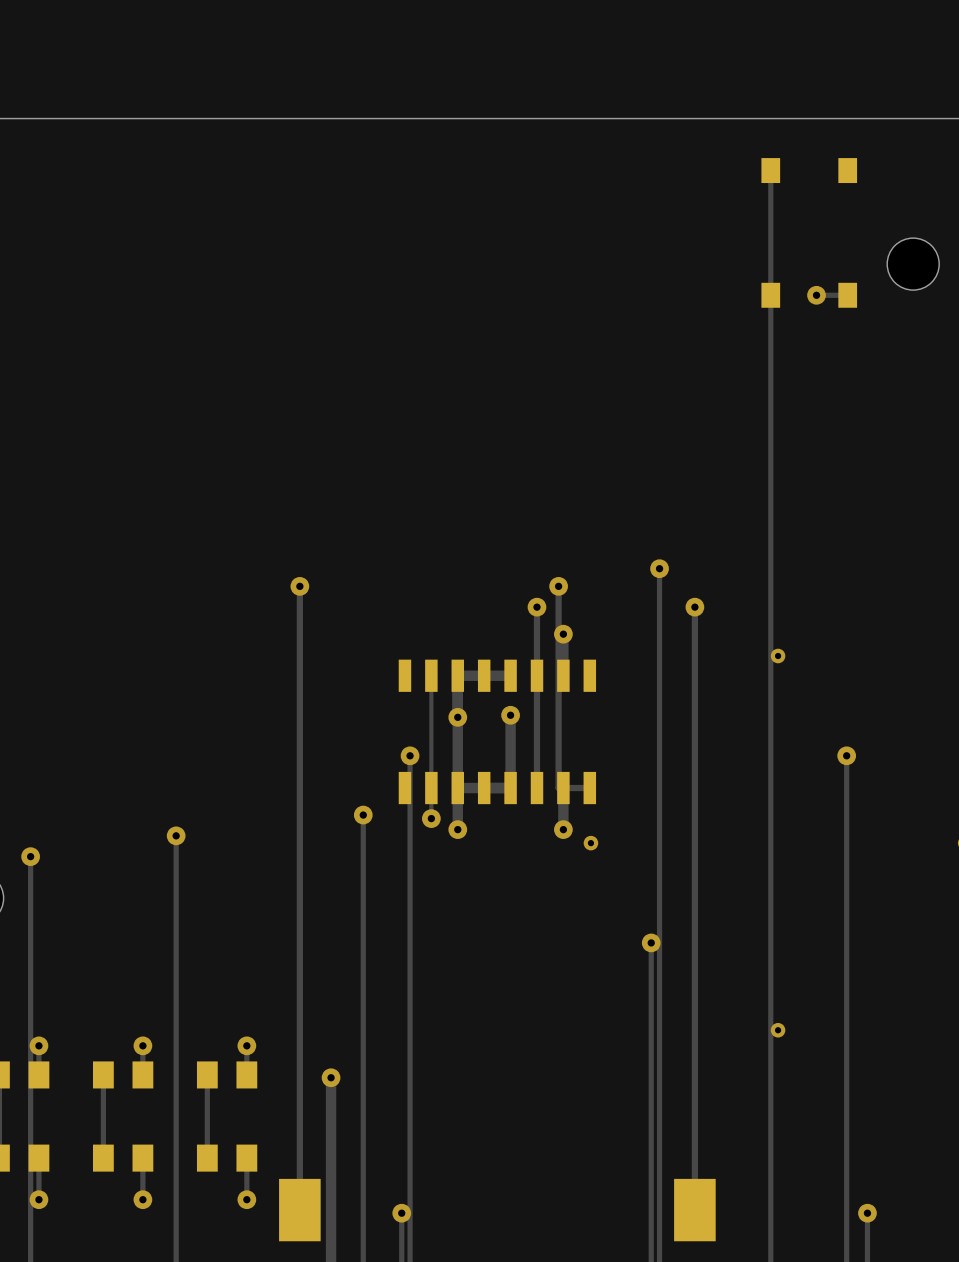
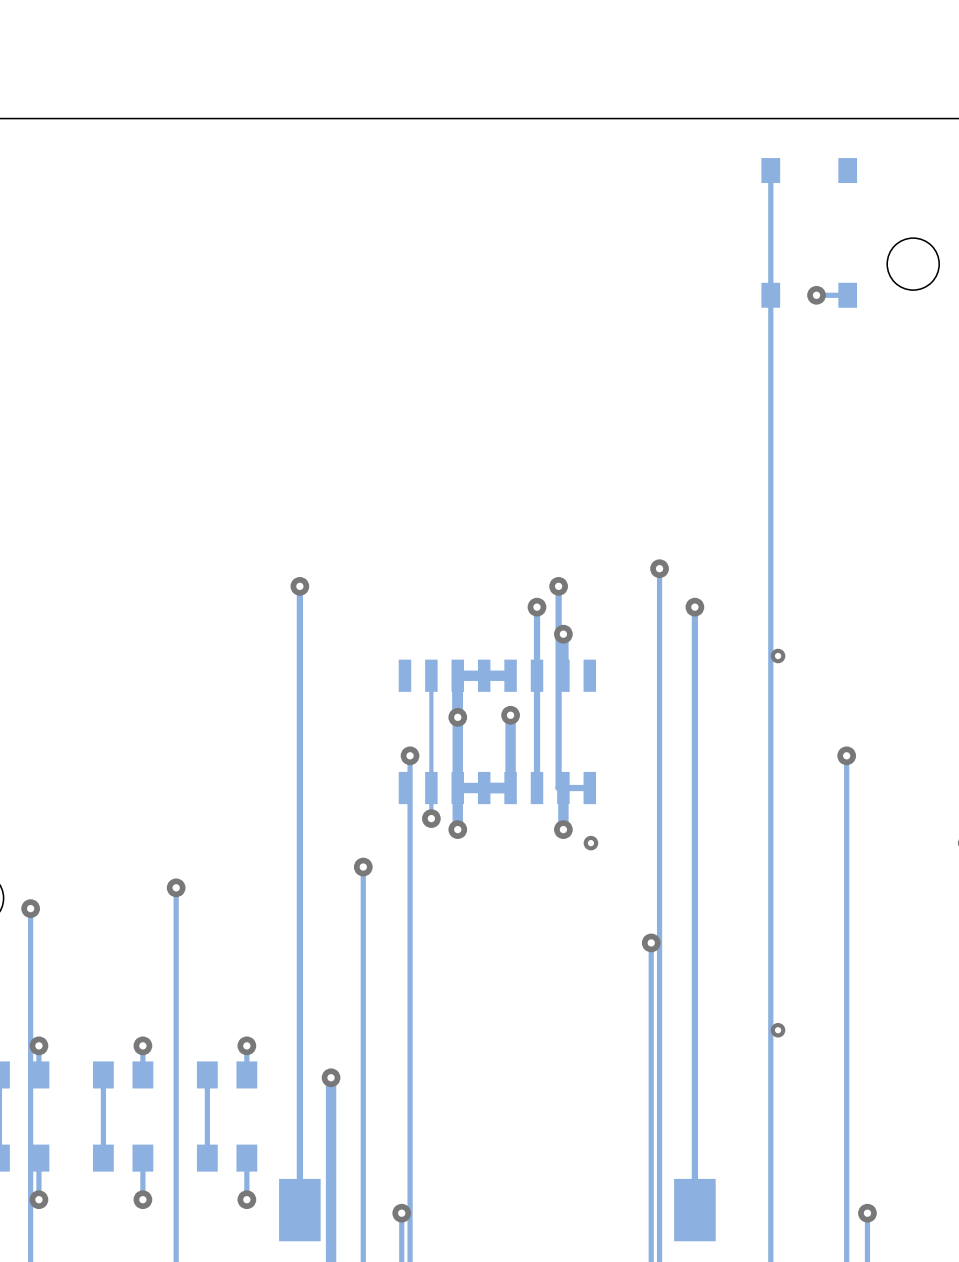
track: (363, 815) (363, 867) -> none
via position: (363, 815) -> (363, 867)
track: (176, 835) (176, 887) -> none
via position: (176, 835) -> (176, 887)
track: (30, 856) (30, 908) -> none
via position: (30, 856) -> (30, 908)

